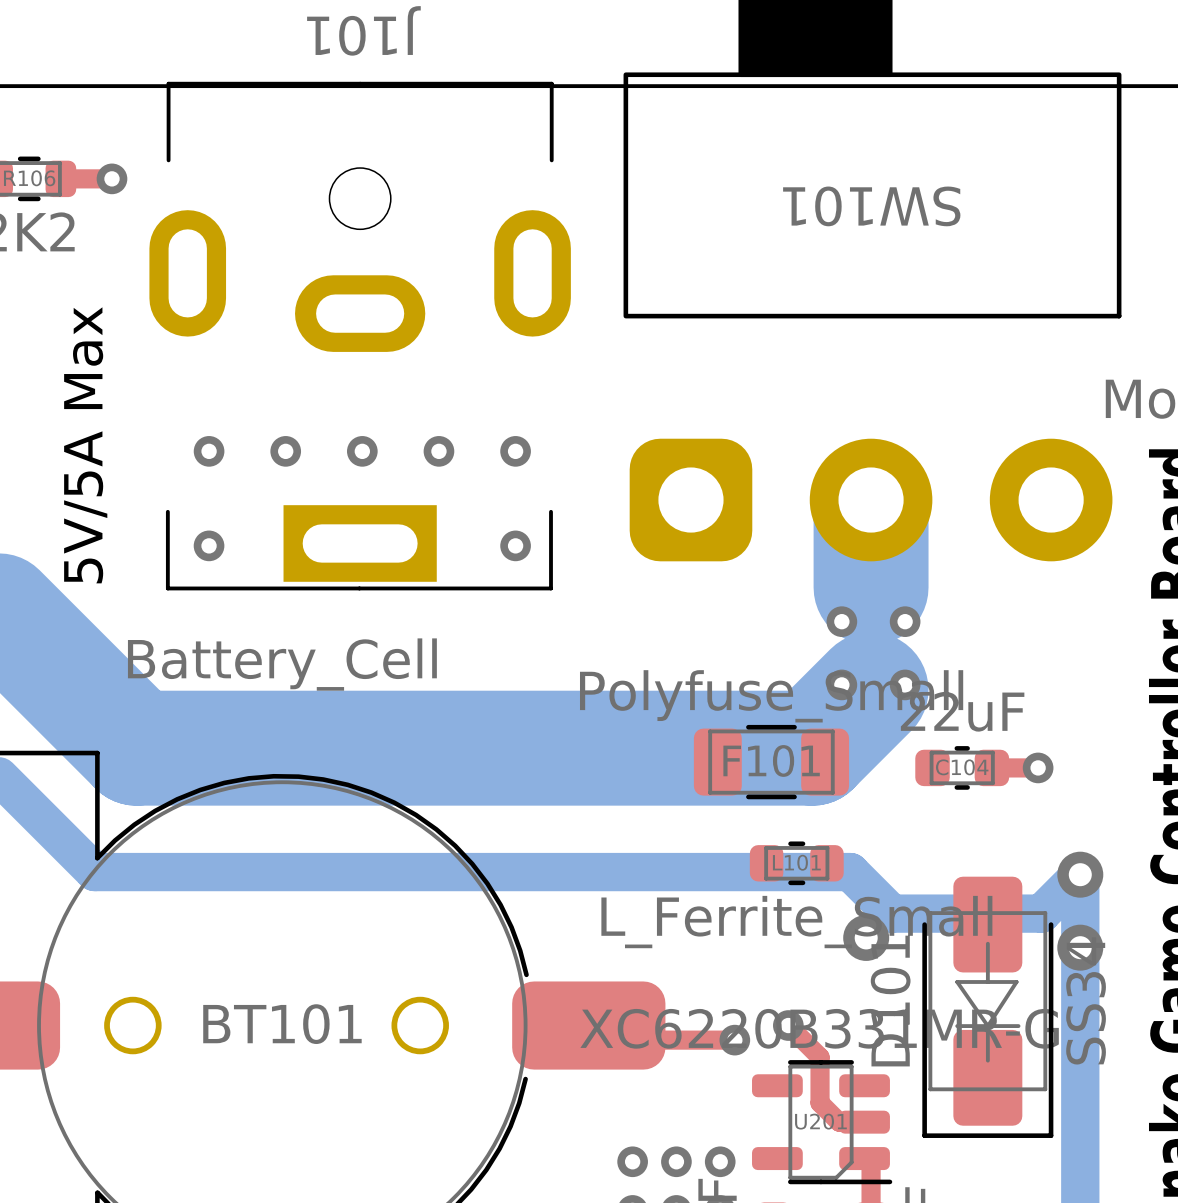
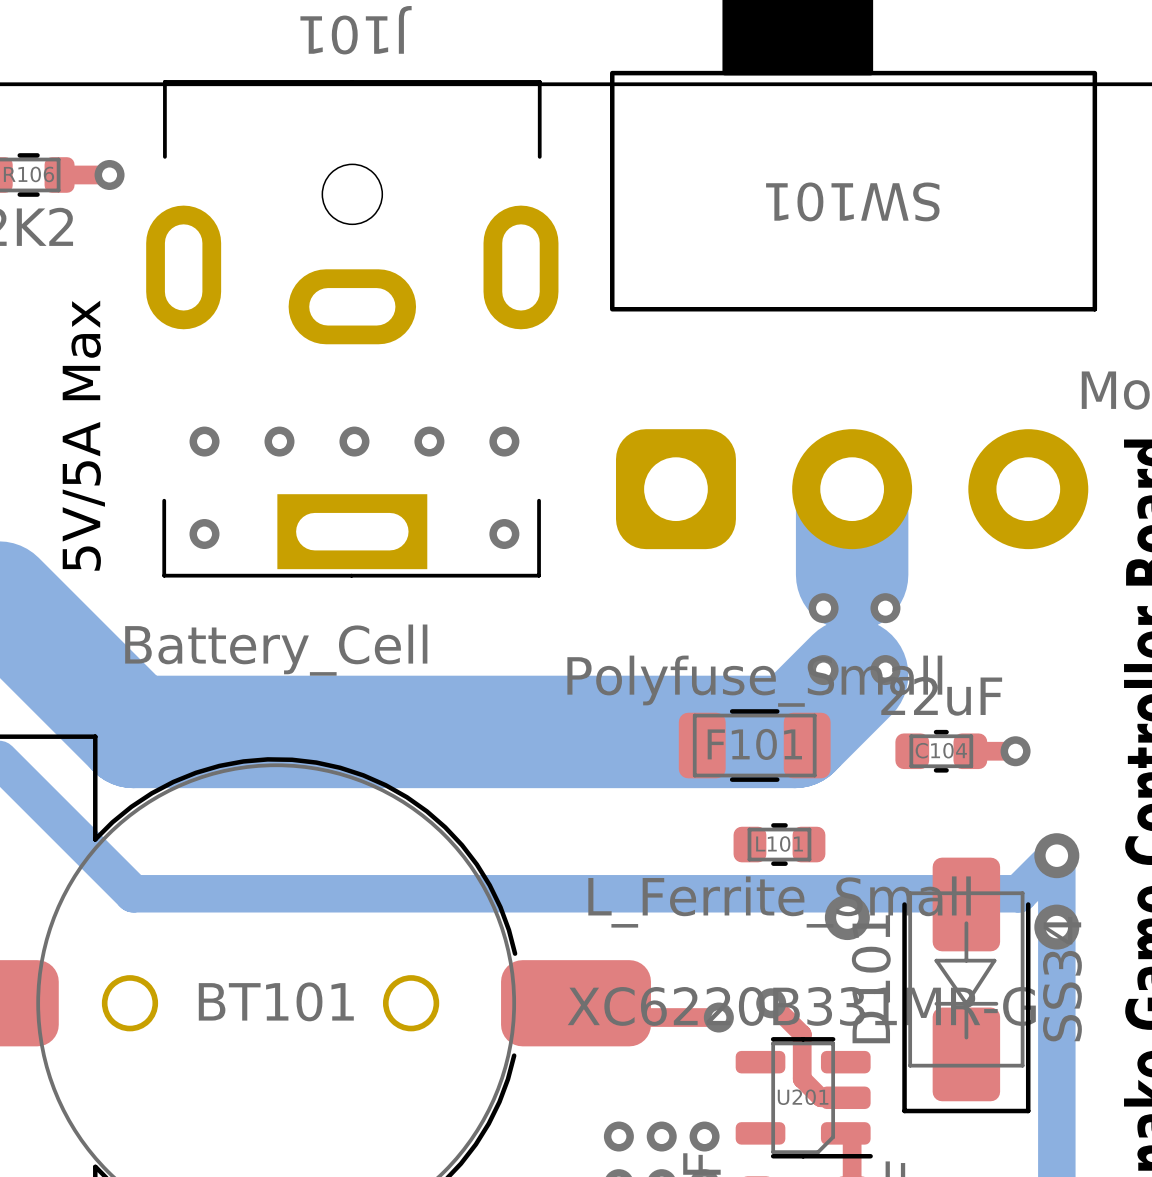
bottom track: (94, 872) (850, 872) (891, 913) -> (92, 853) (133, 893) (872, 893)

